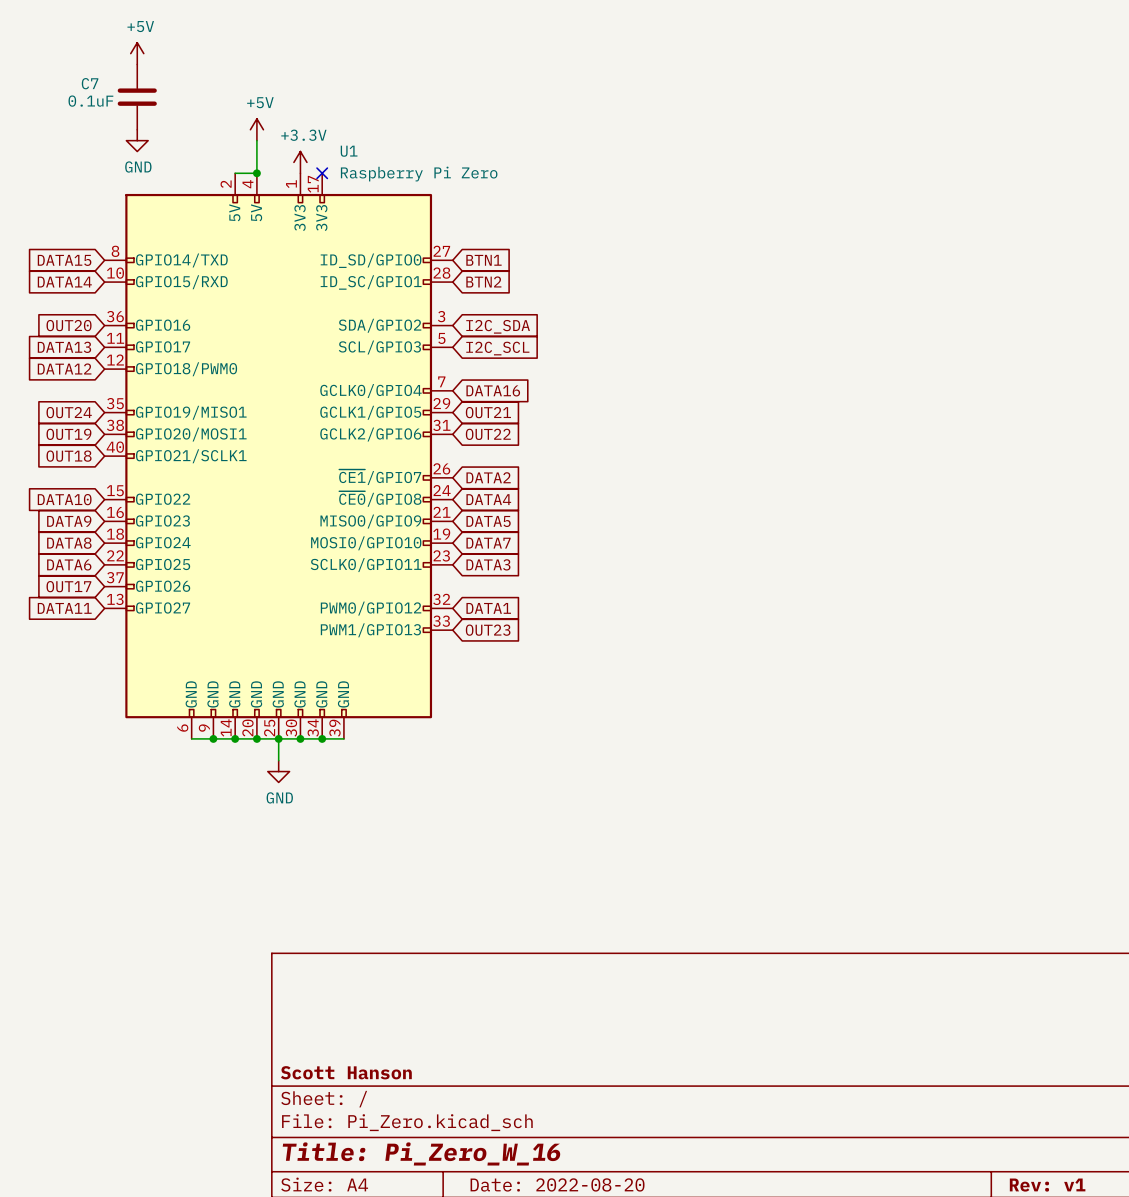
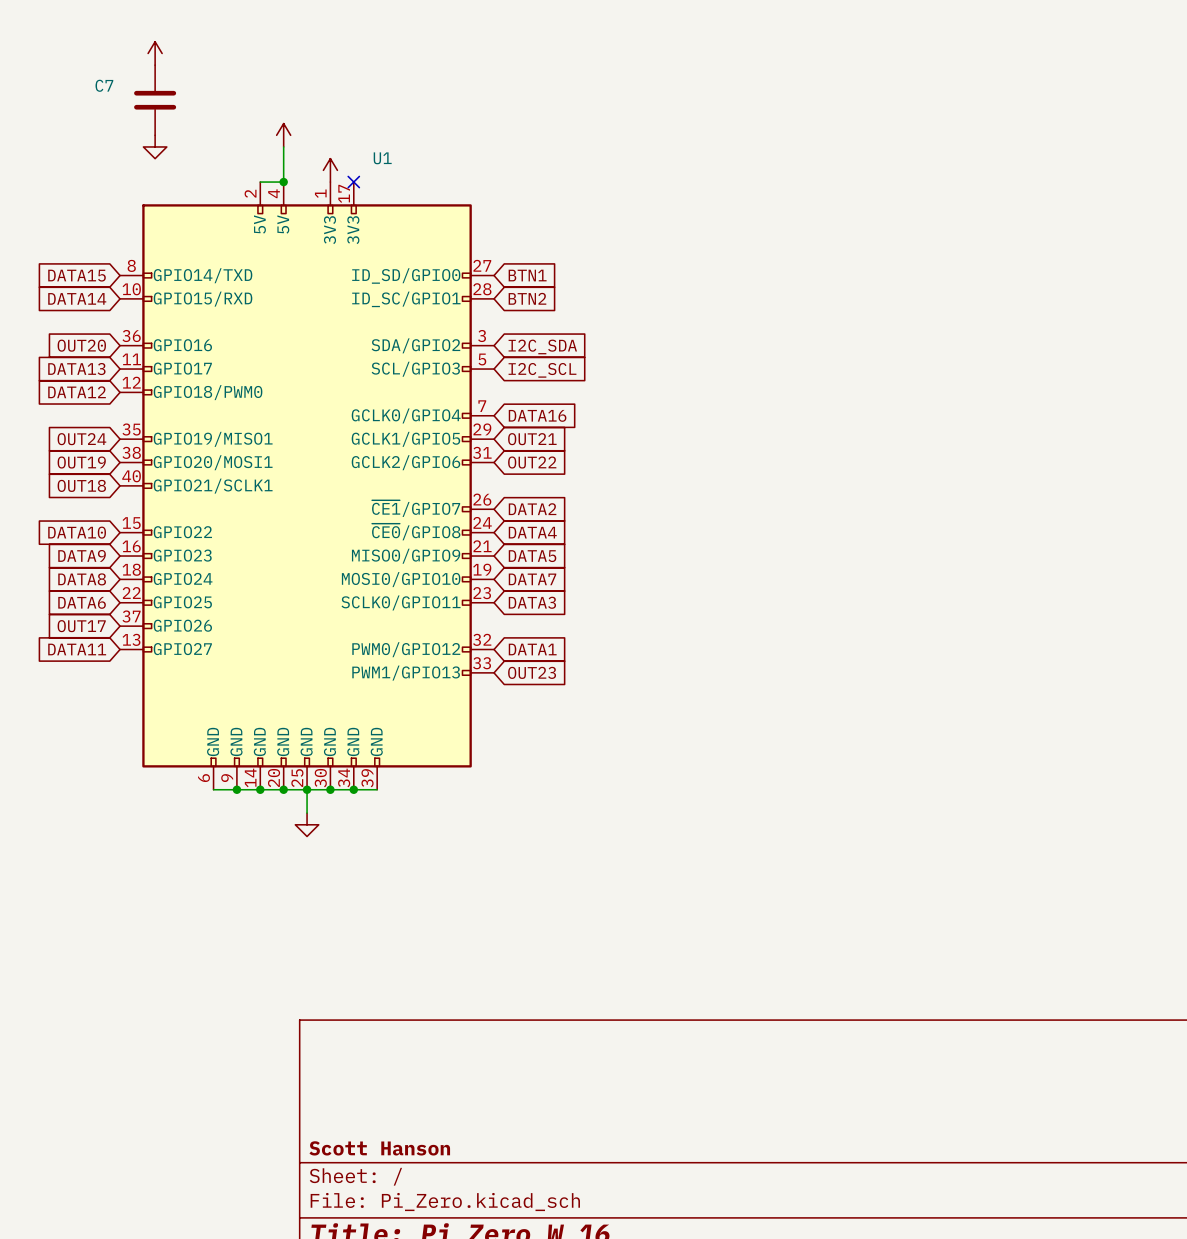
power symbol text: +5V (140, 26) -> none
C7 value: 0.1uF (90, 101) -> none
power symbol text: +5V (260, 102) -> none
power symbol text: +3.3V (303, 135) -> none
power symbol text: GND (138, 167) -> none
U1 value: Raspberry Pi Zero (419, 174) -> none
power symbol text: GND (279, 797) -> none

